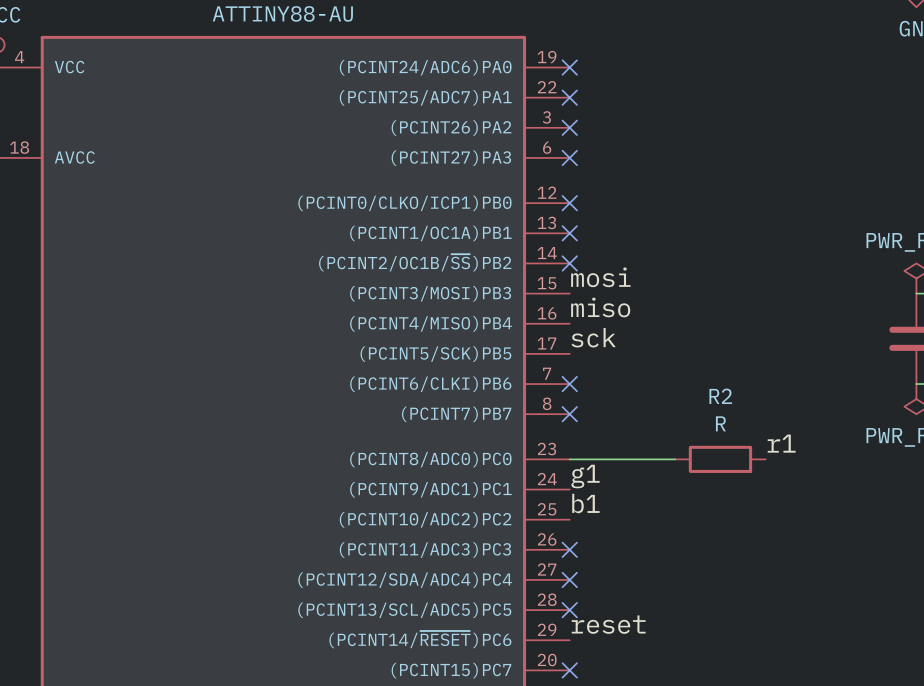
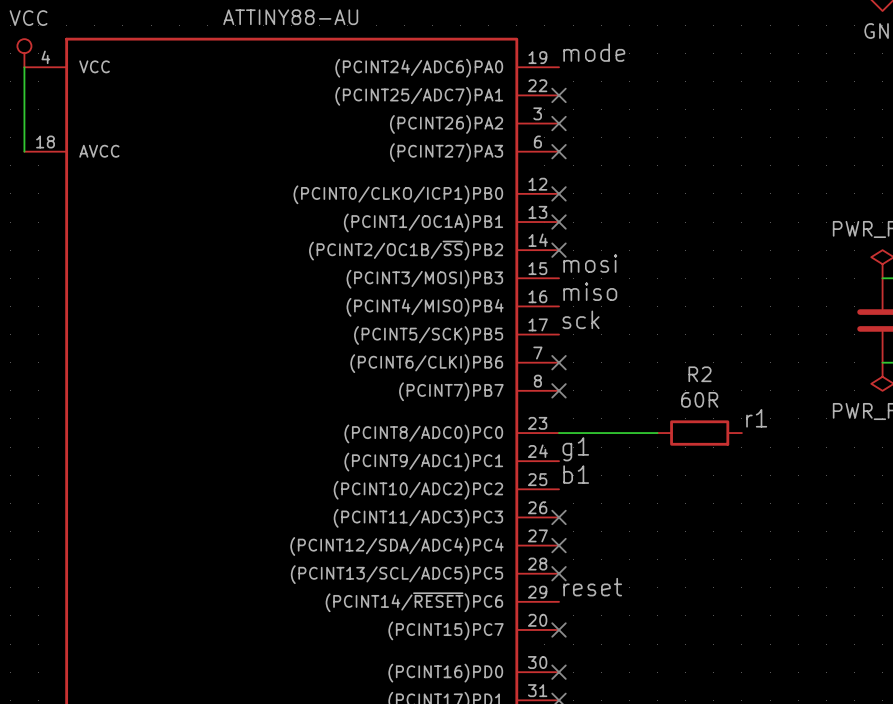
label: none -> mode (594, 52)
no-connect mark: (569, 67) -> none
R2 value: R (720, 423) -> 60R (699, 399)

